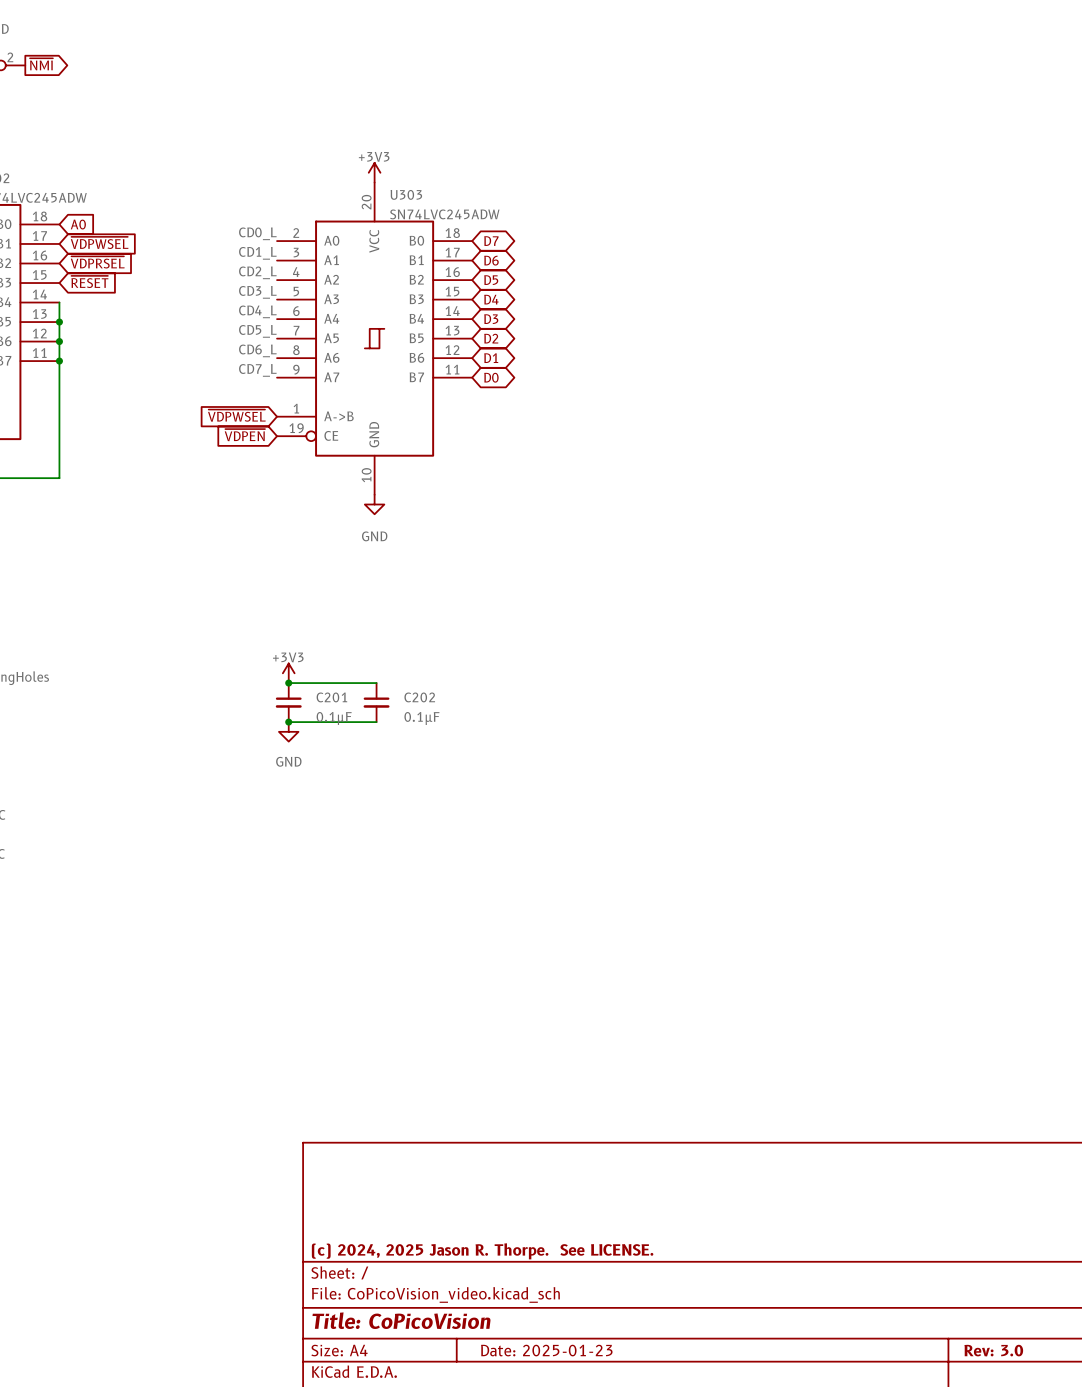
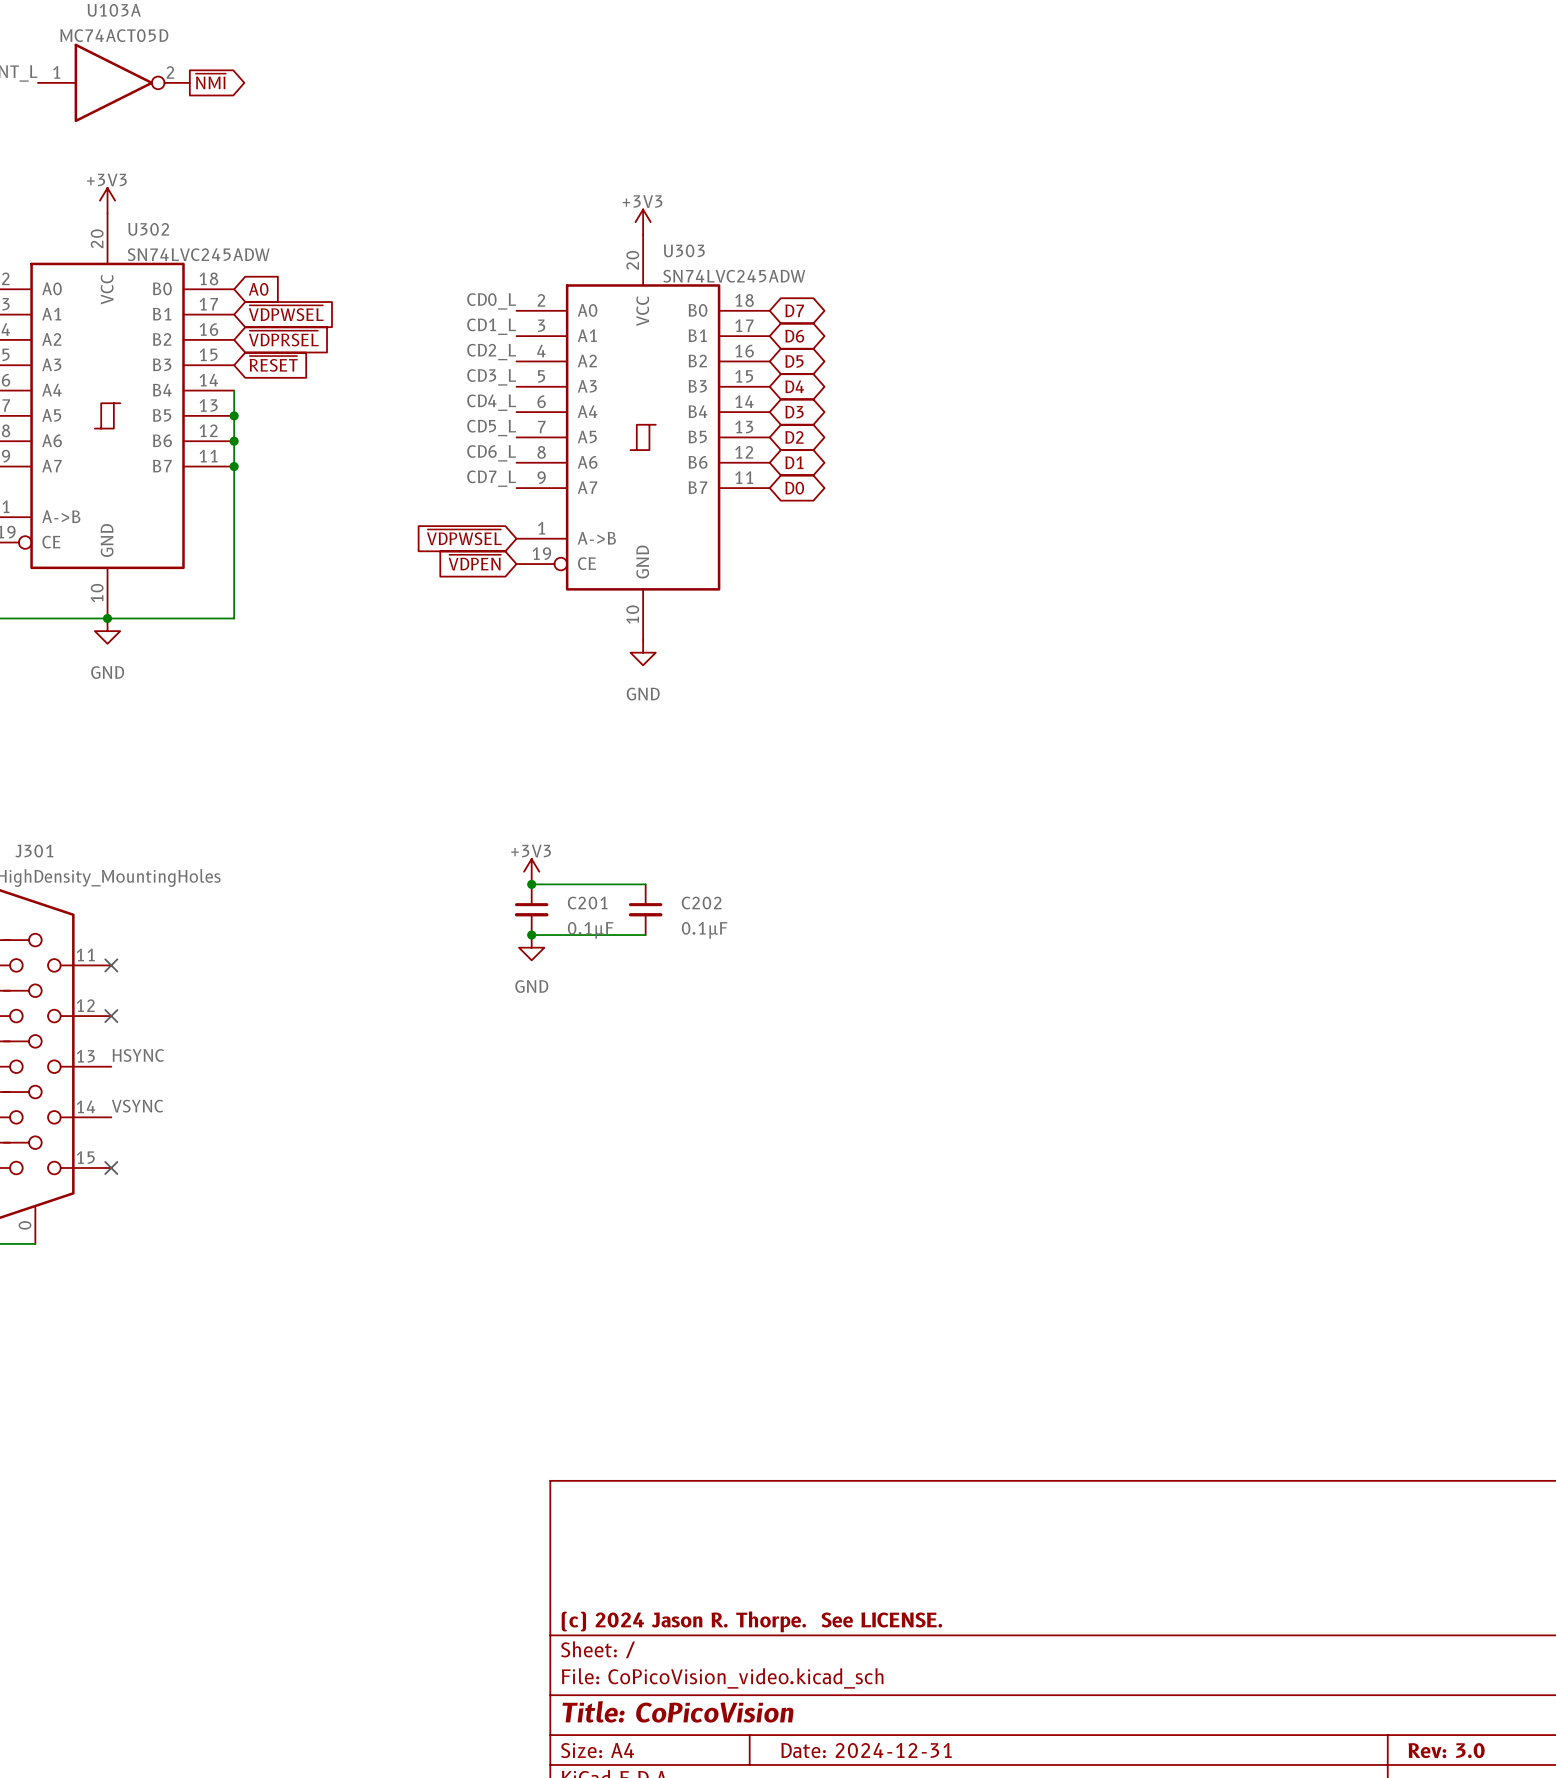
title block: (c) 2024, 2025 Jason R. Thorpe. See LICENSE. (482, 1251) -> (c) 2024 Jason R. Thorpe. See LICENSE. (751, 1621)
title block: Date: 2025-01-23 (546, 1350) -> Date: 2024-12-31 (866, 1750)

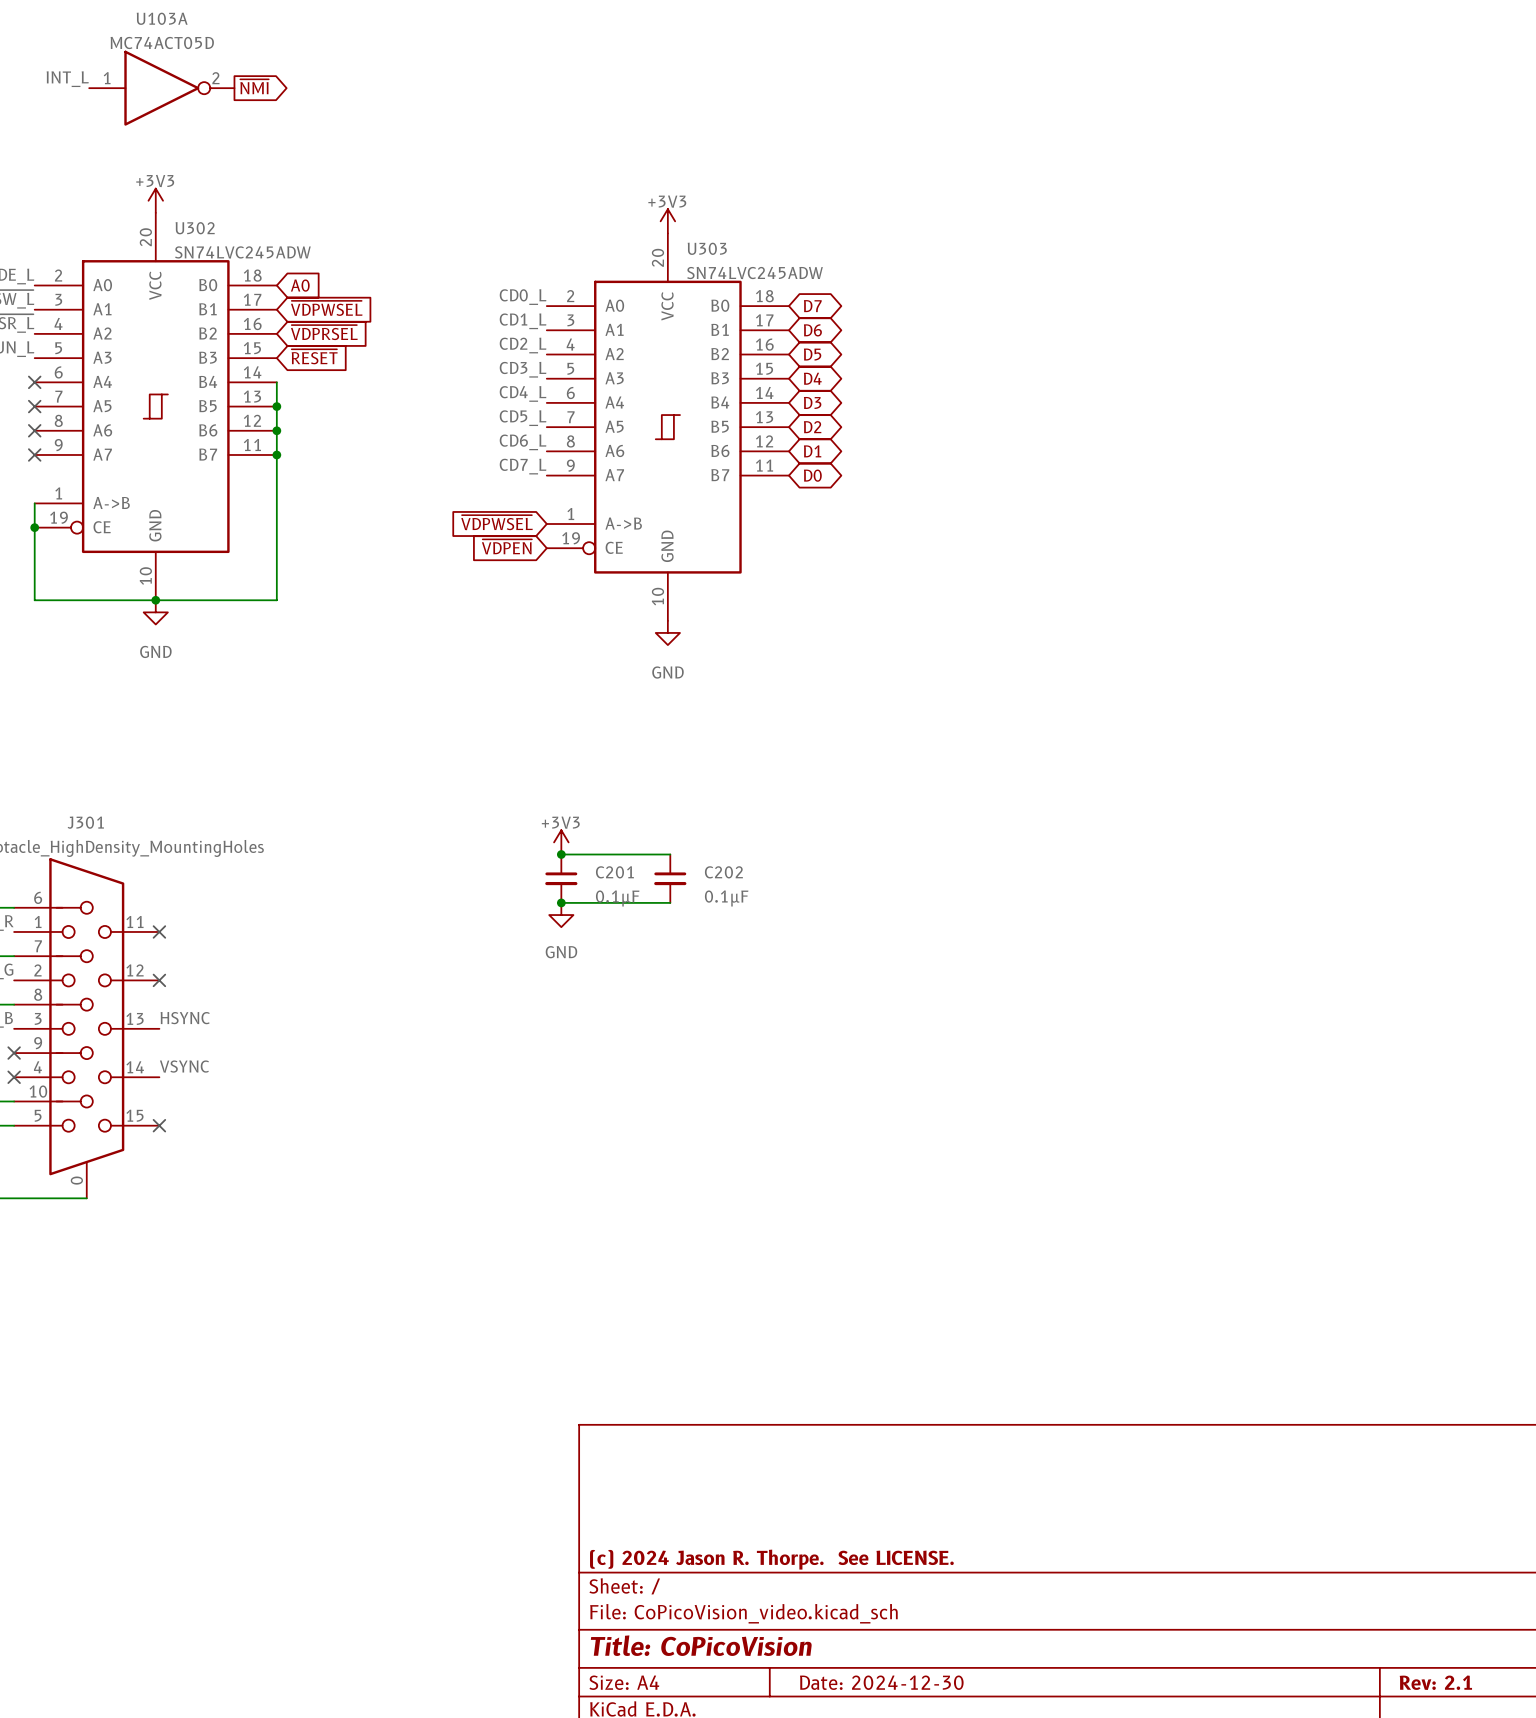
title block: Date: 2024-12-31 (866, 1750) -> Date: 2024-12-30 (881, 1682)
title block: Rev: 3.0 (1446, 1750) -> Rev: 2.1 (1435, 1682)

